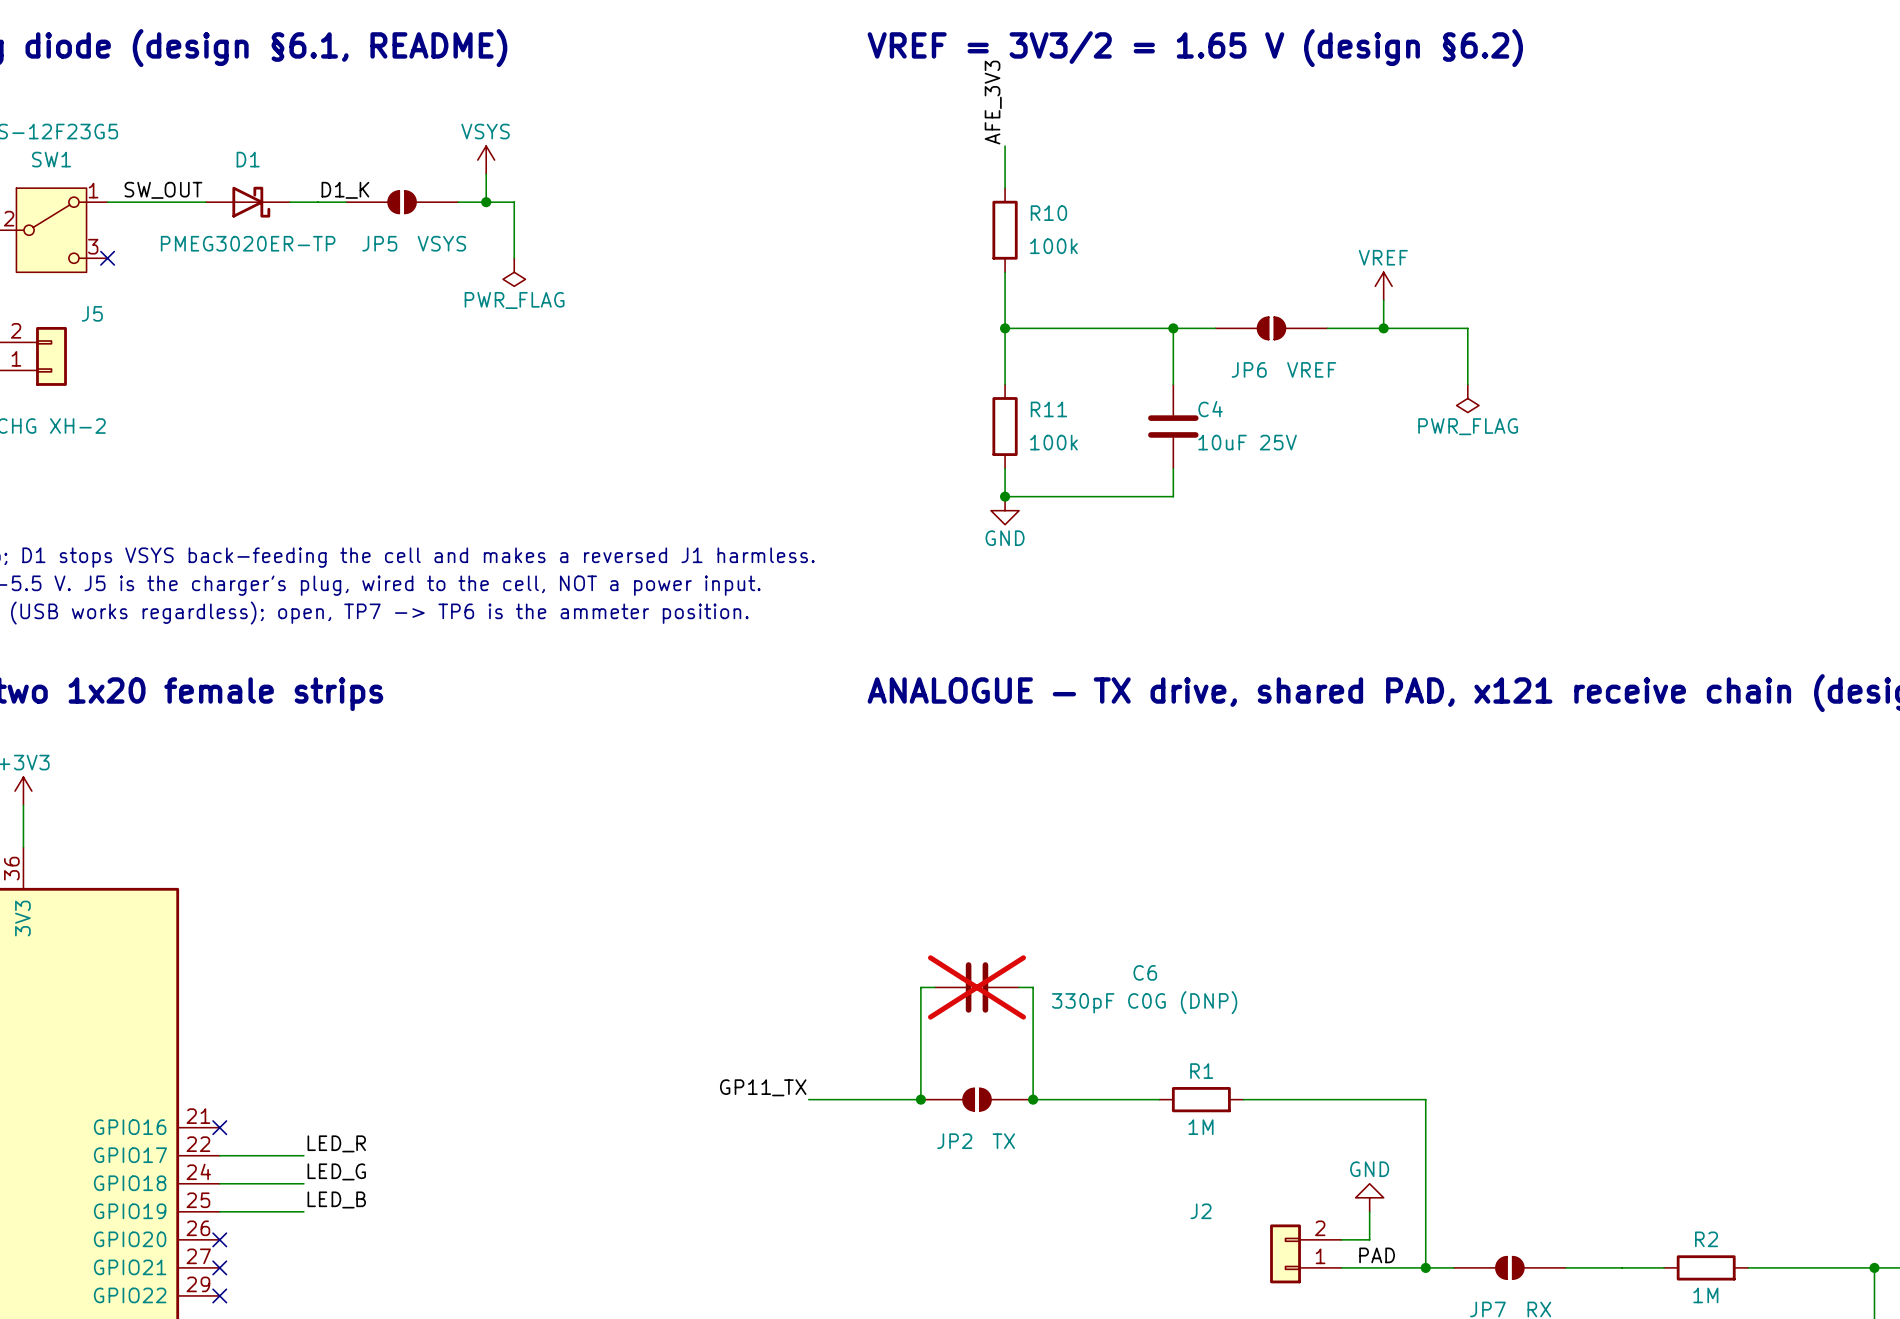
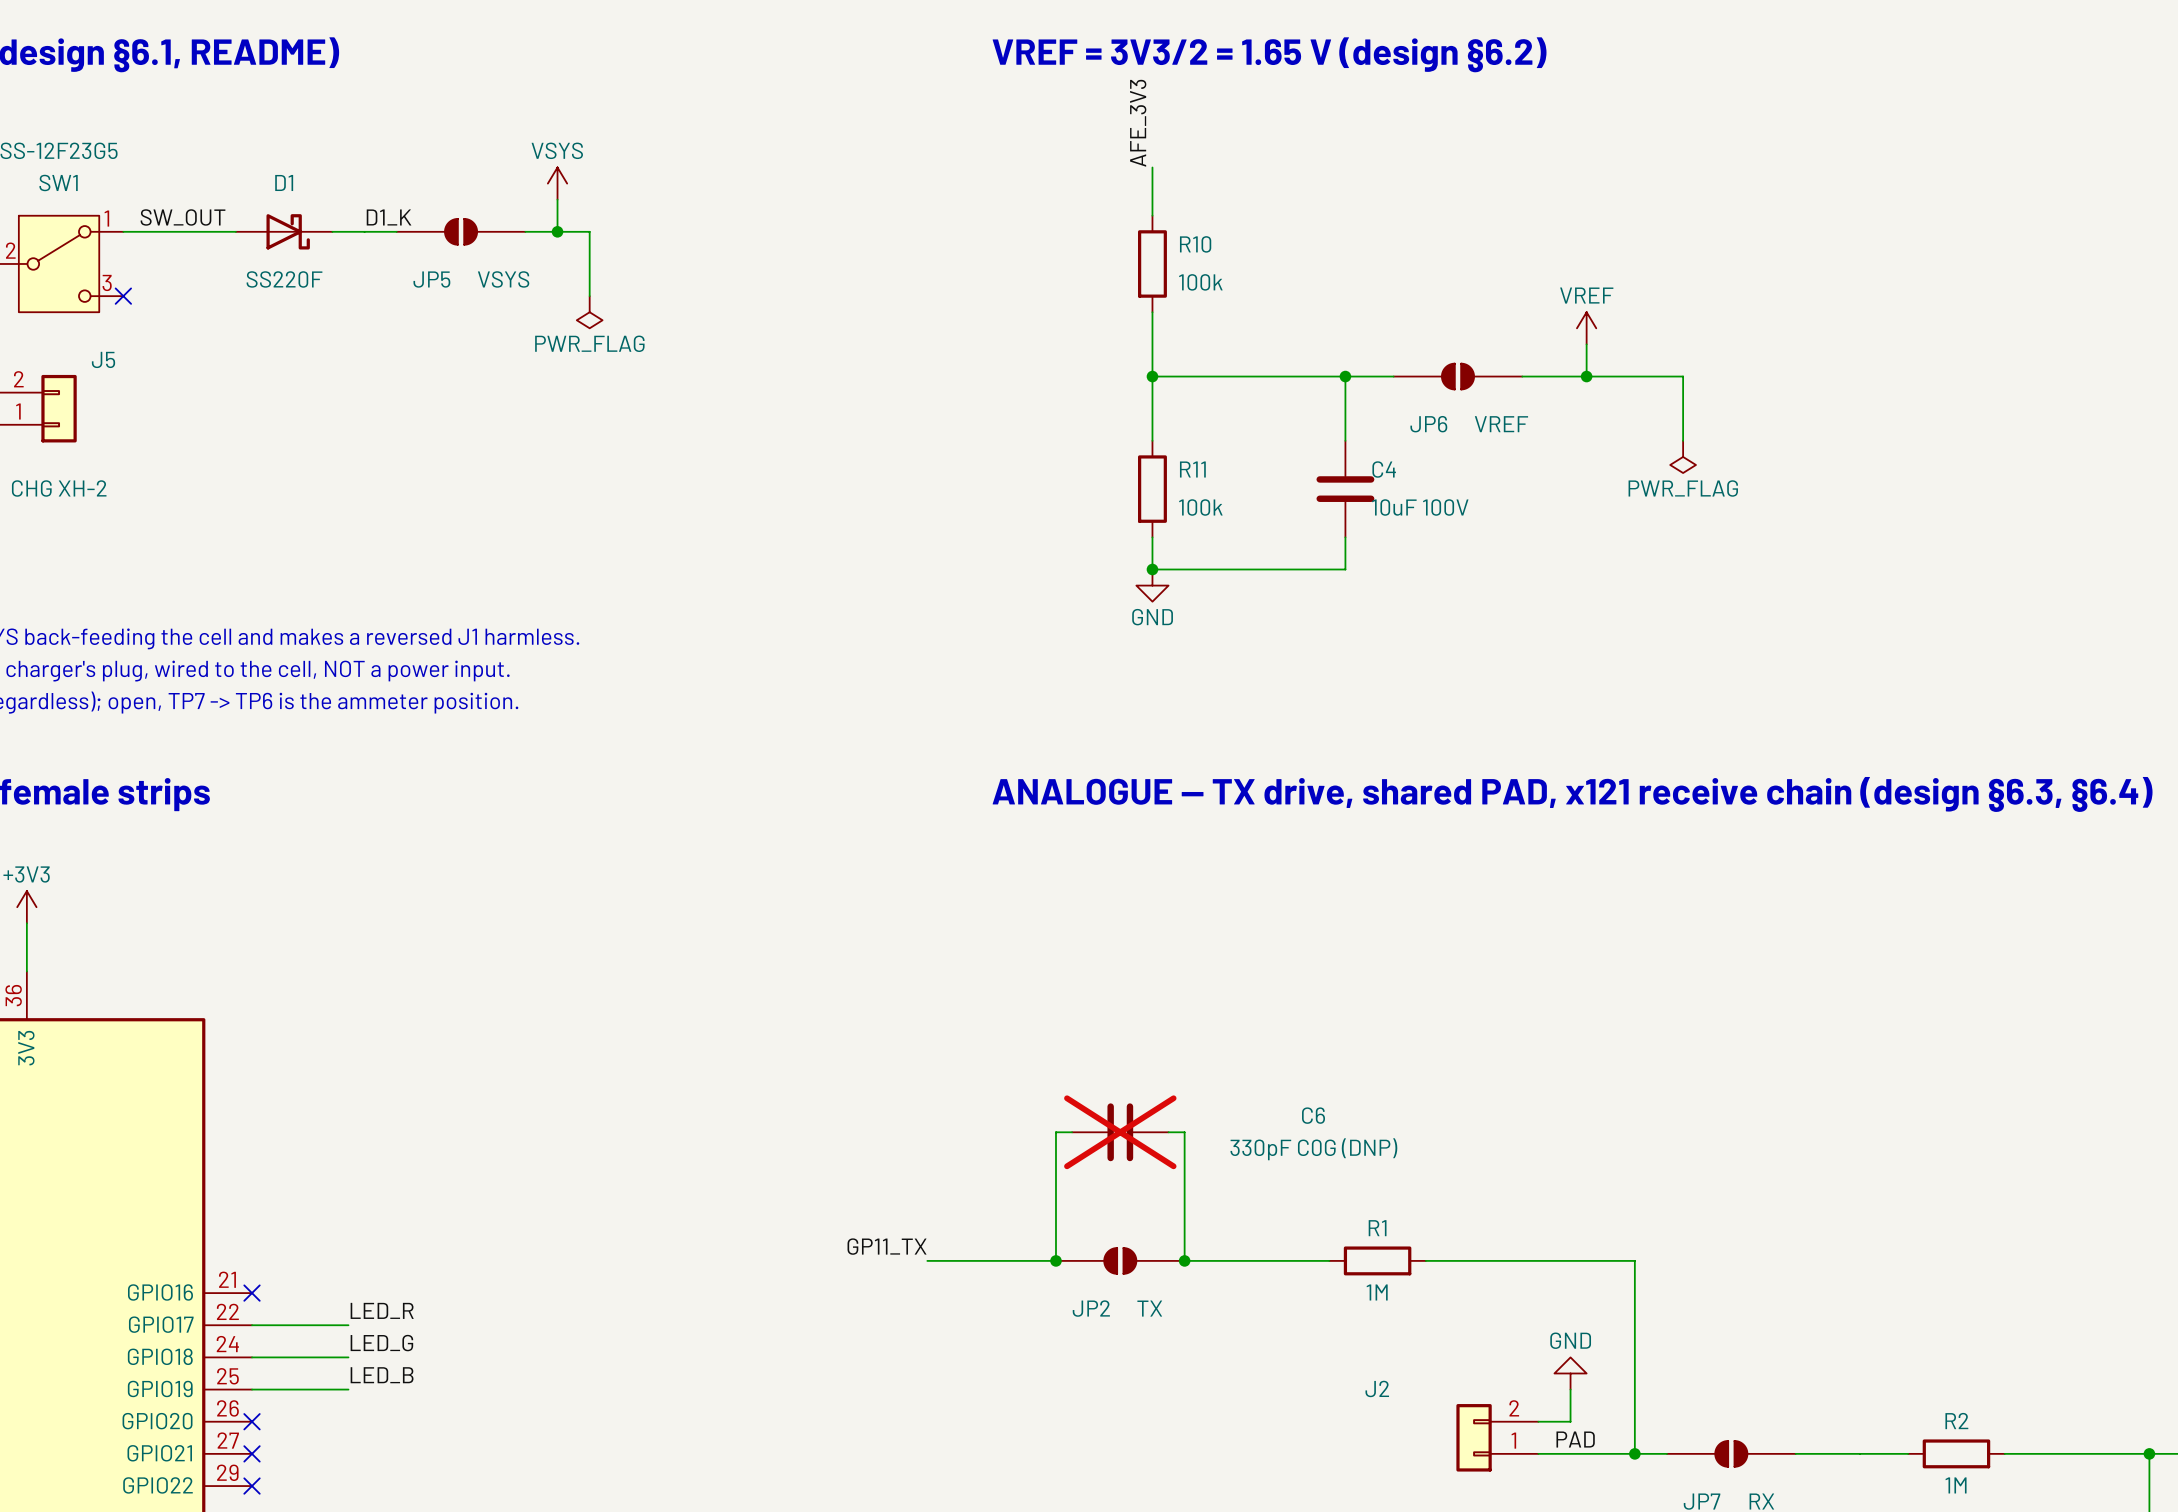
D1 value: PMEG3020ER-TP (248, 243) -> SS220F (284, 279)
C4 value: 10uF 25V (1247, 442) -> 10uF 100V (1420, 507)

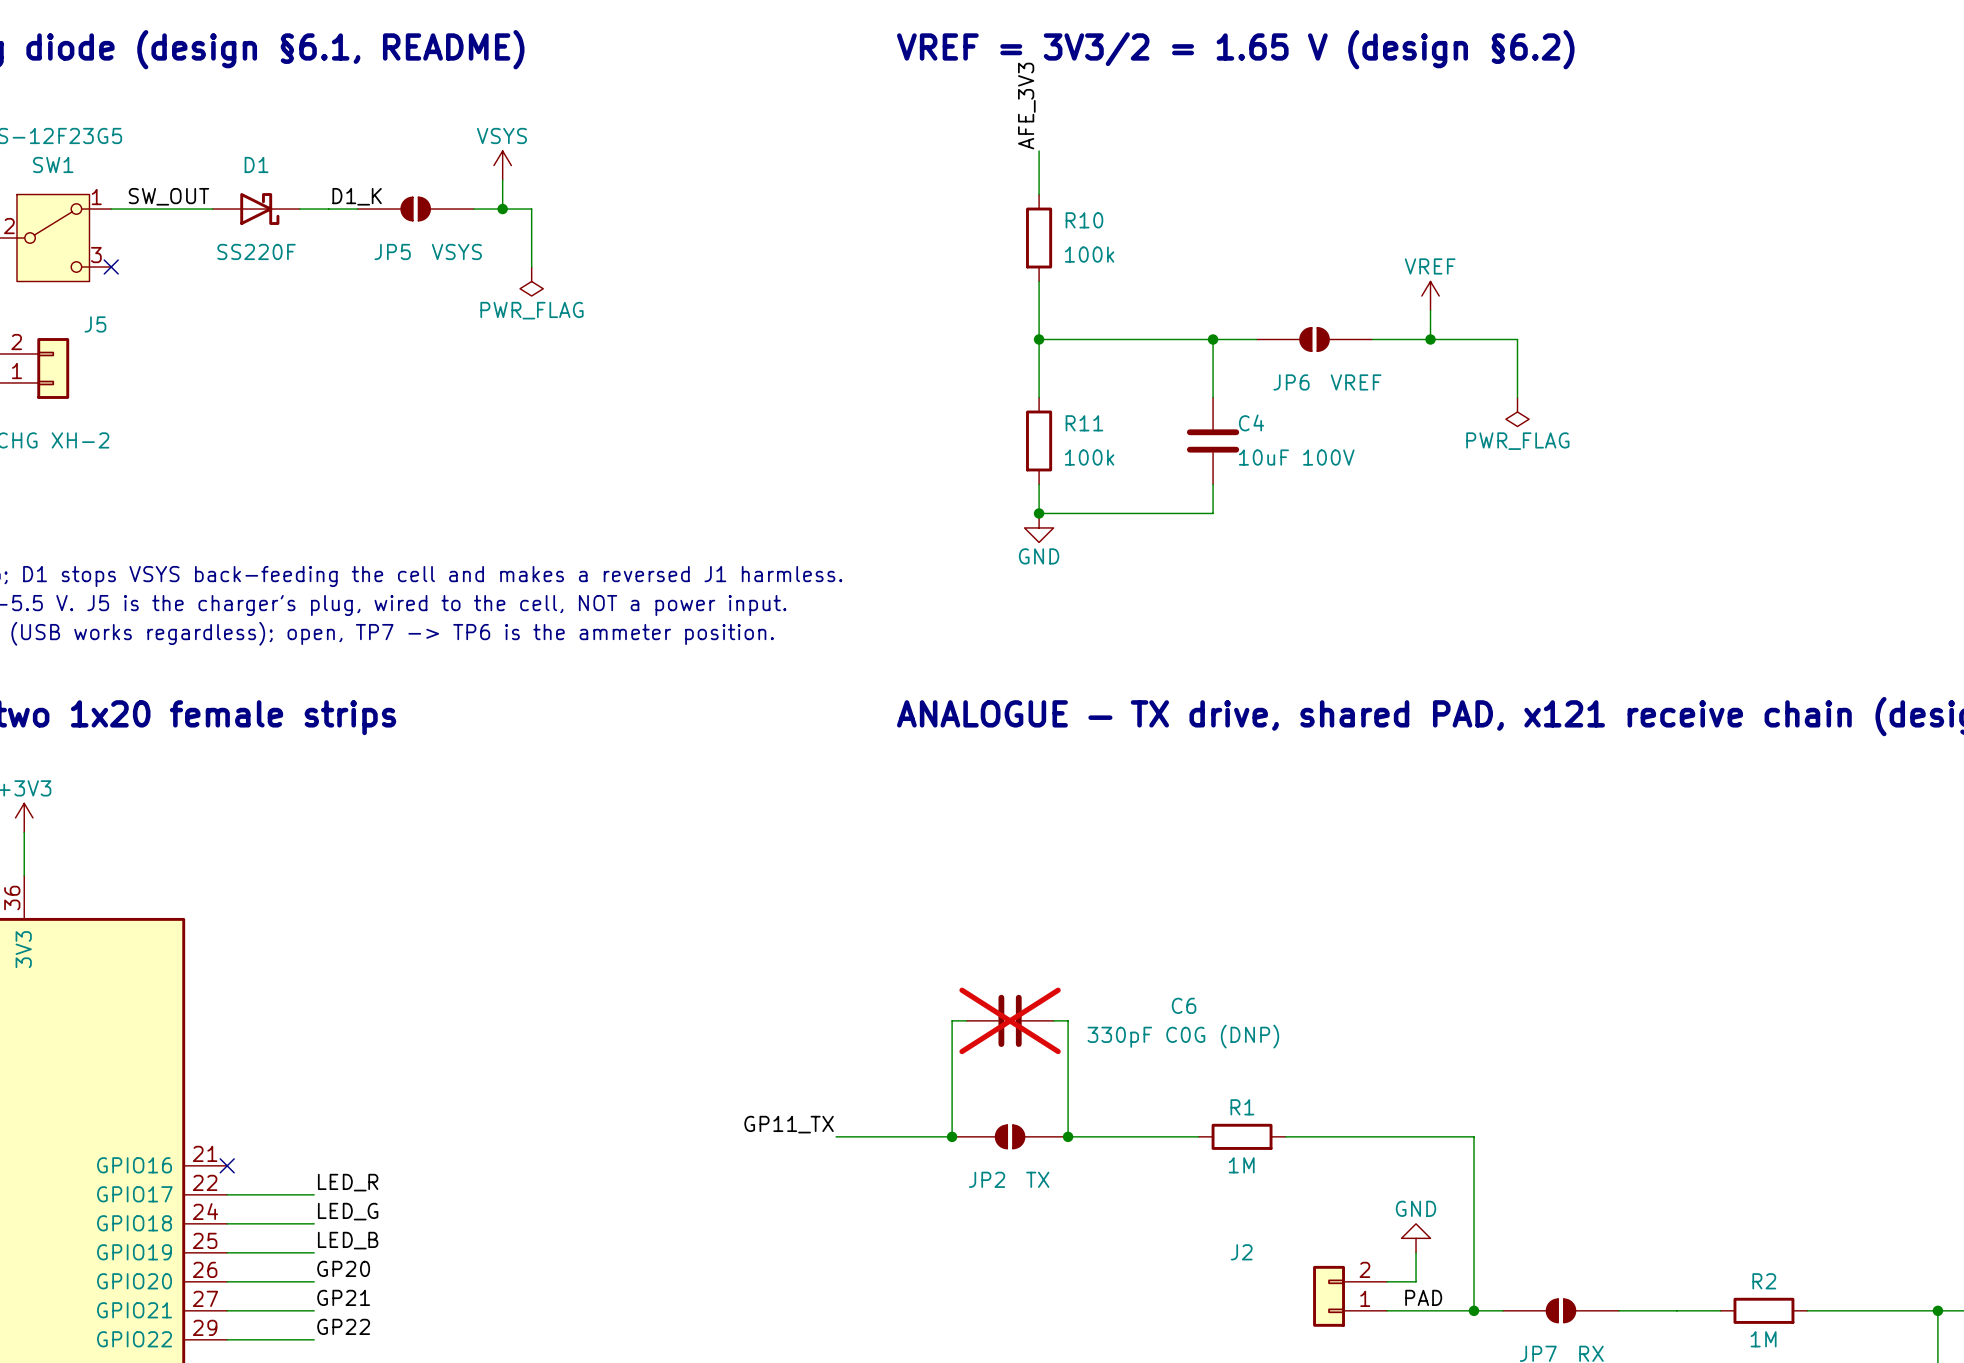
label: none -> GP20 (343, 1268)
wire: none -> (227, 1281) (314, 1281)
no-connect mark: (252, 1421) -> none
label: none -> GP21 (343, 1297)
wire: none -> (227, 1310) (314, 1310)
no-connect mark: (252, 1453) -> none
label: none -> GP22 (343, 1326)
wire: none -> (227, 1339) (314, 1339)
no-connect mark: (252, 1486) -> none

